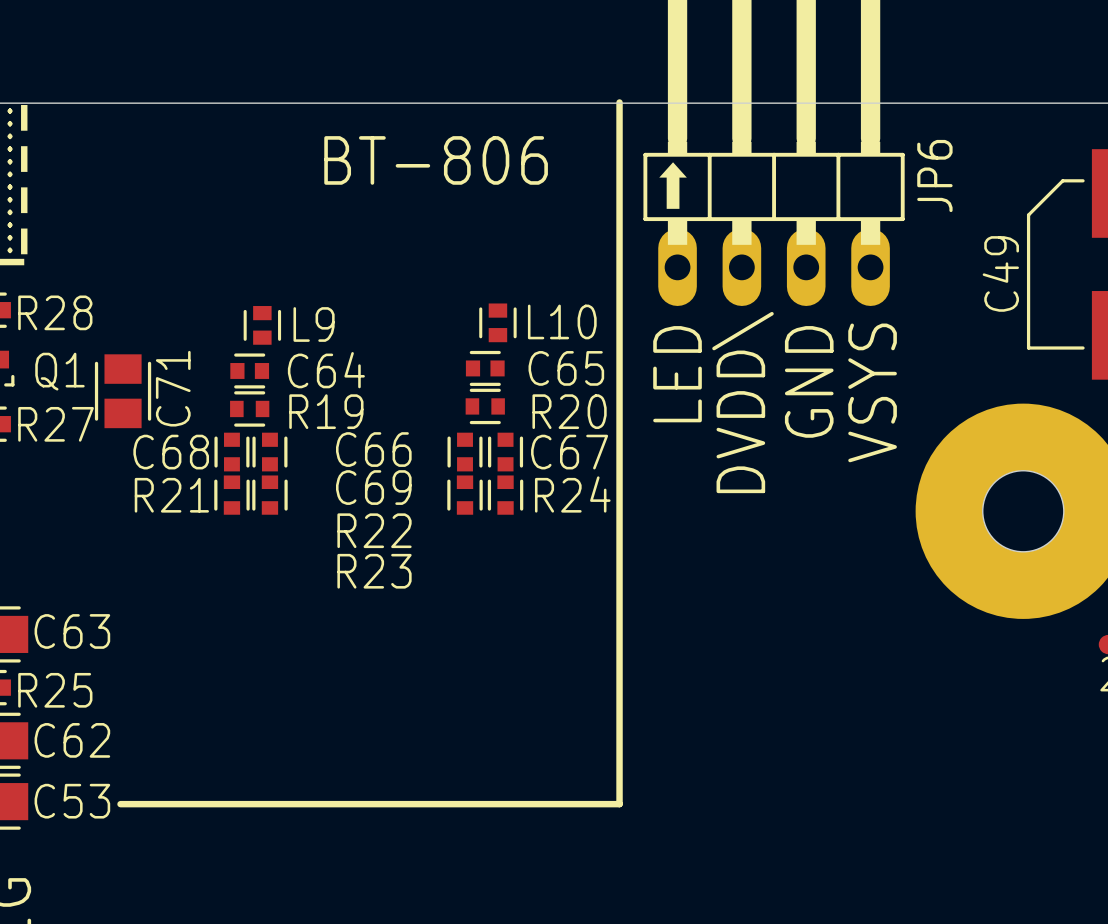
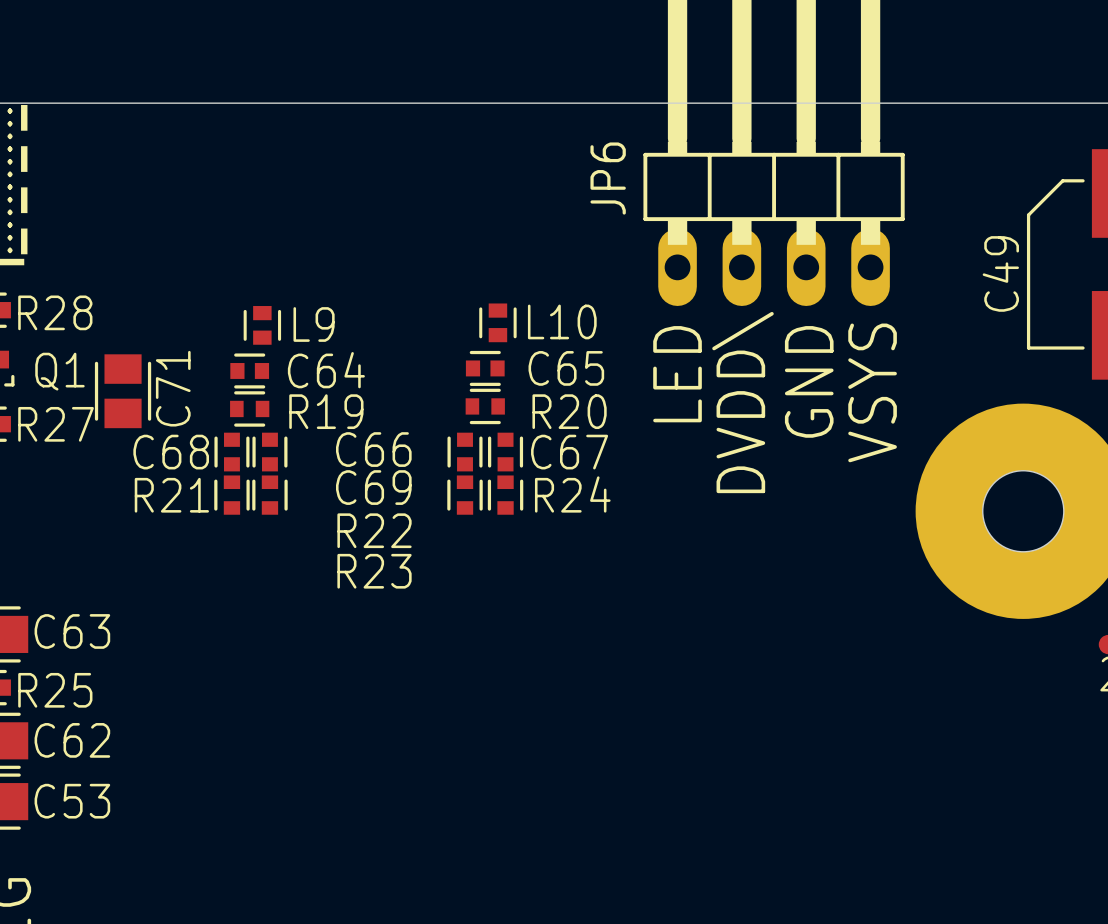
line: (619, 102) (619, 804) (120, 804) -> none
text: BT-806 (436, 160) -> none
JP6 name position: JP6 (934, 175) -> JP6 (608, 178)
text: ⬆️ (673, 185) -> none

